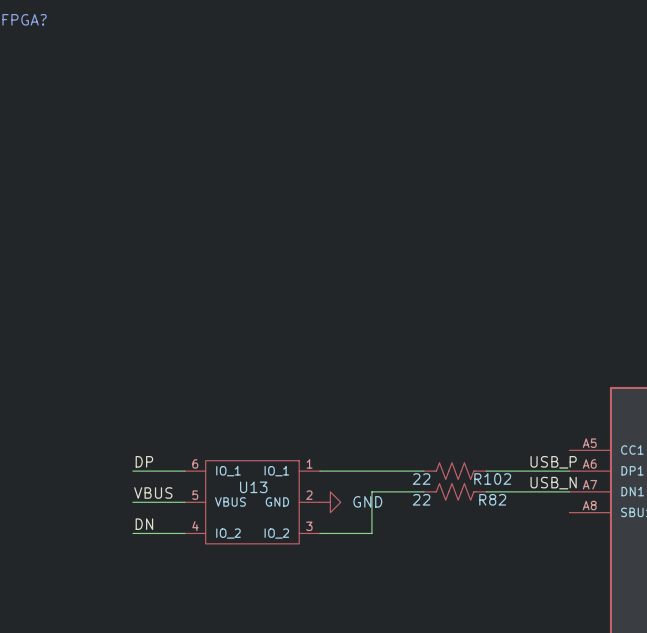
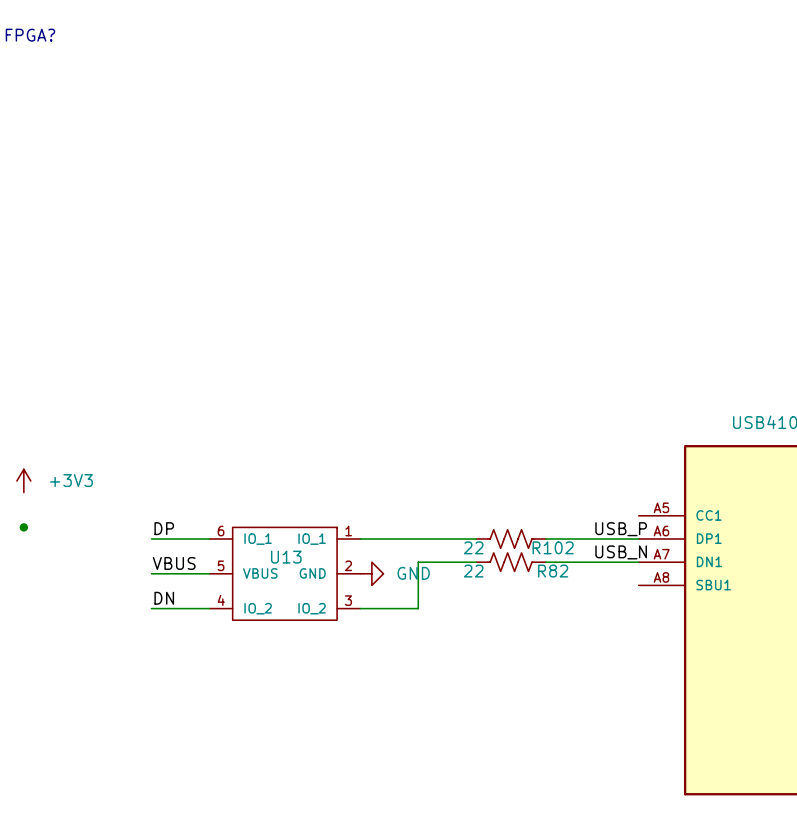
power symbol: none -> +3V3 (23, 480)
junction: none -> (23, 527)

